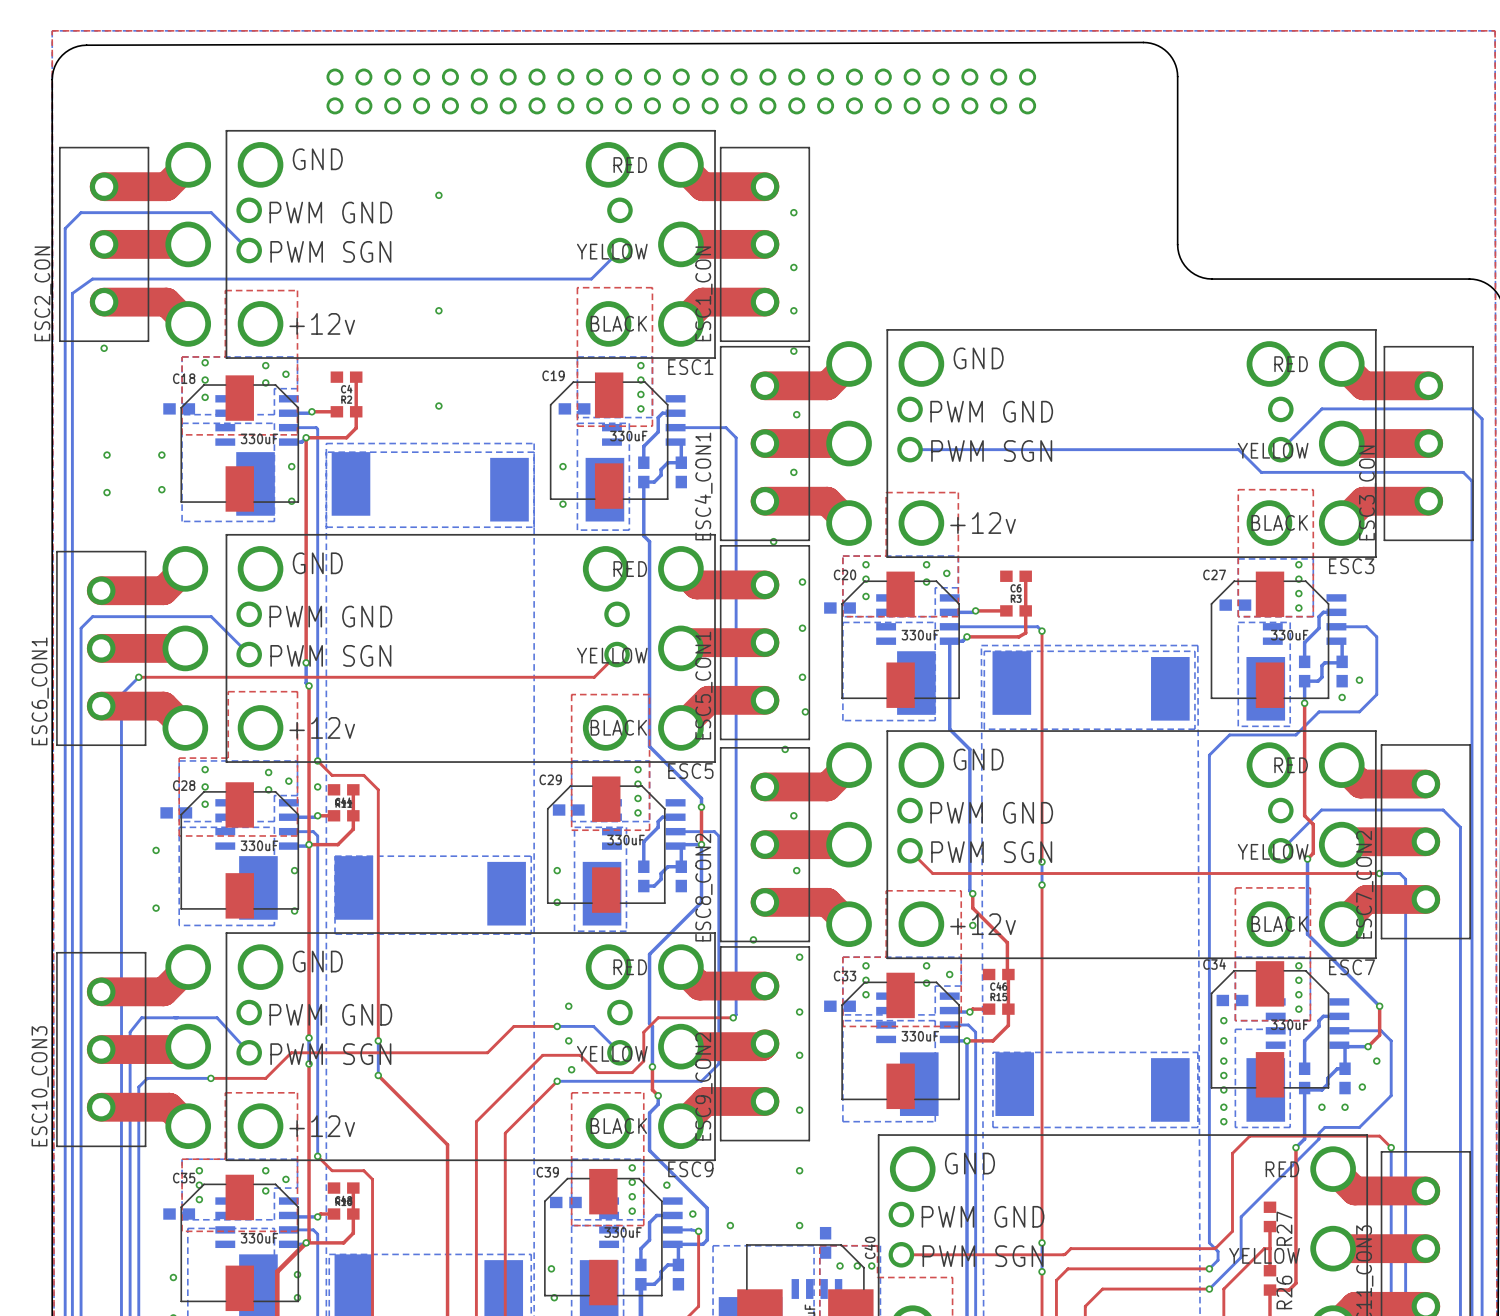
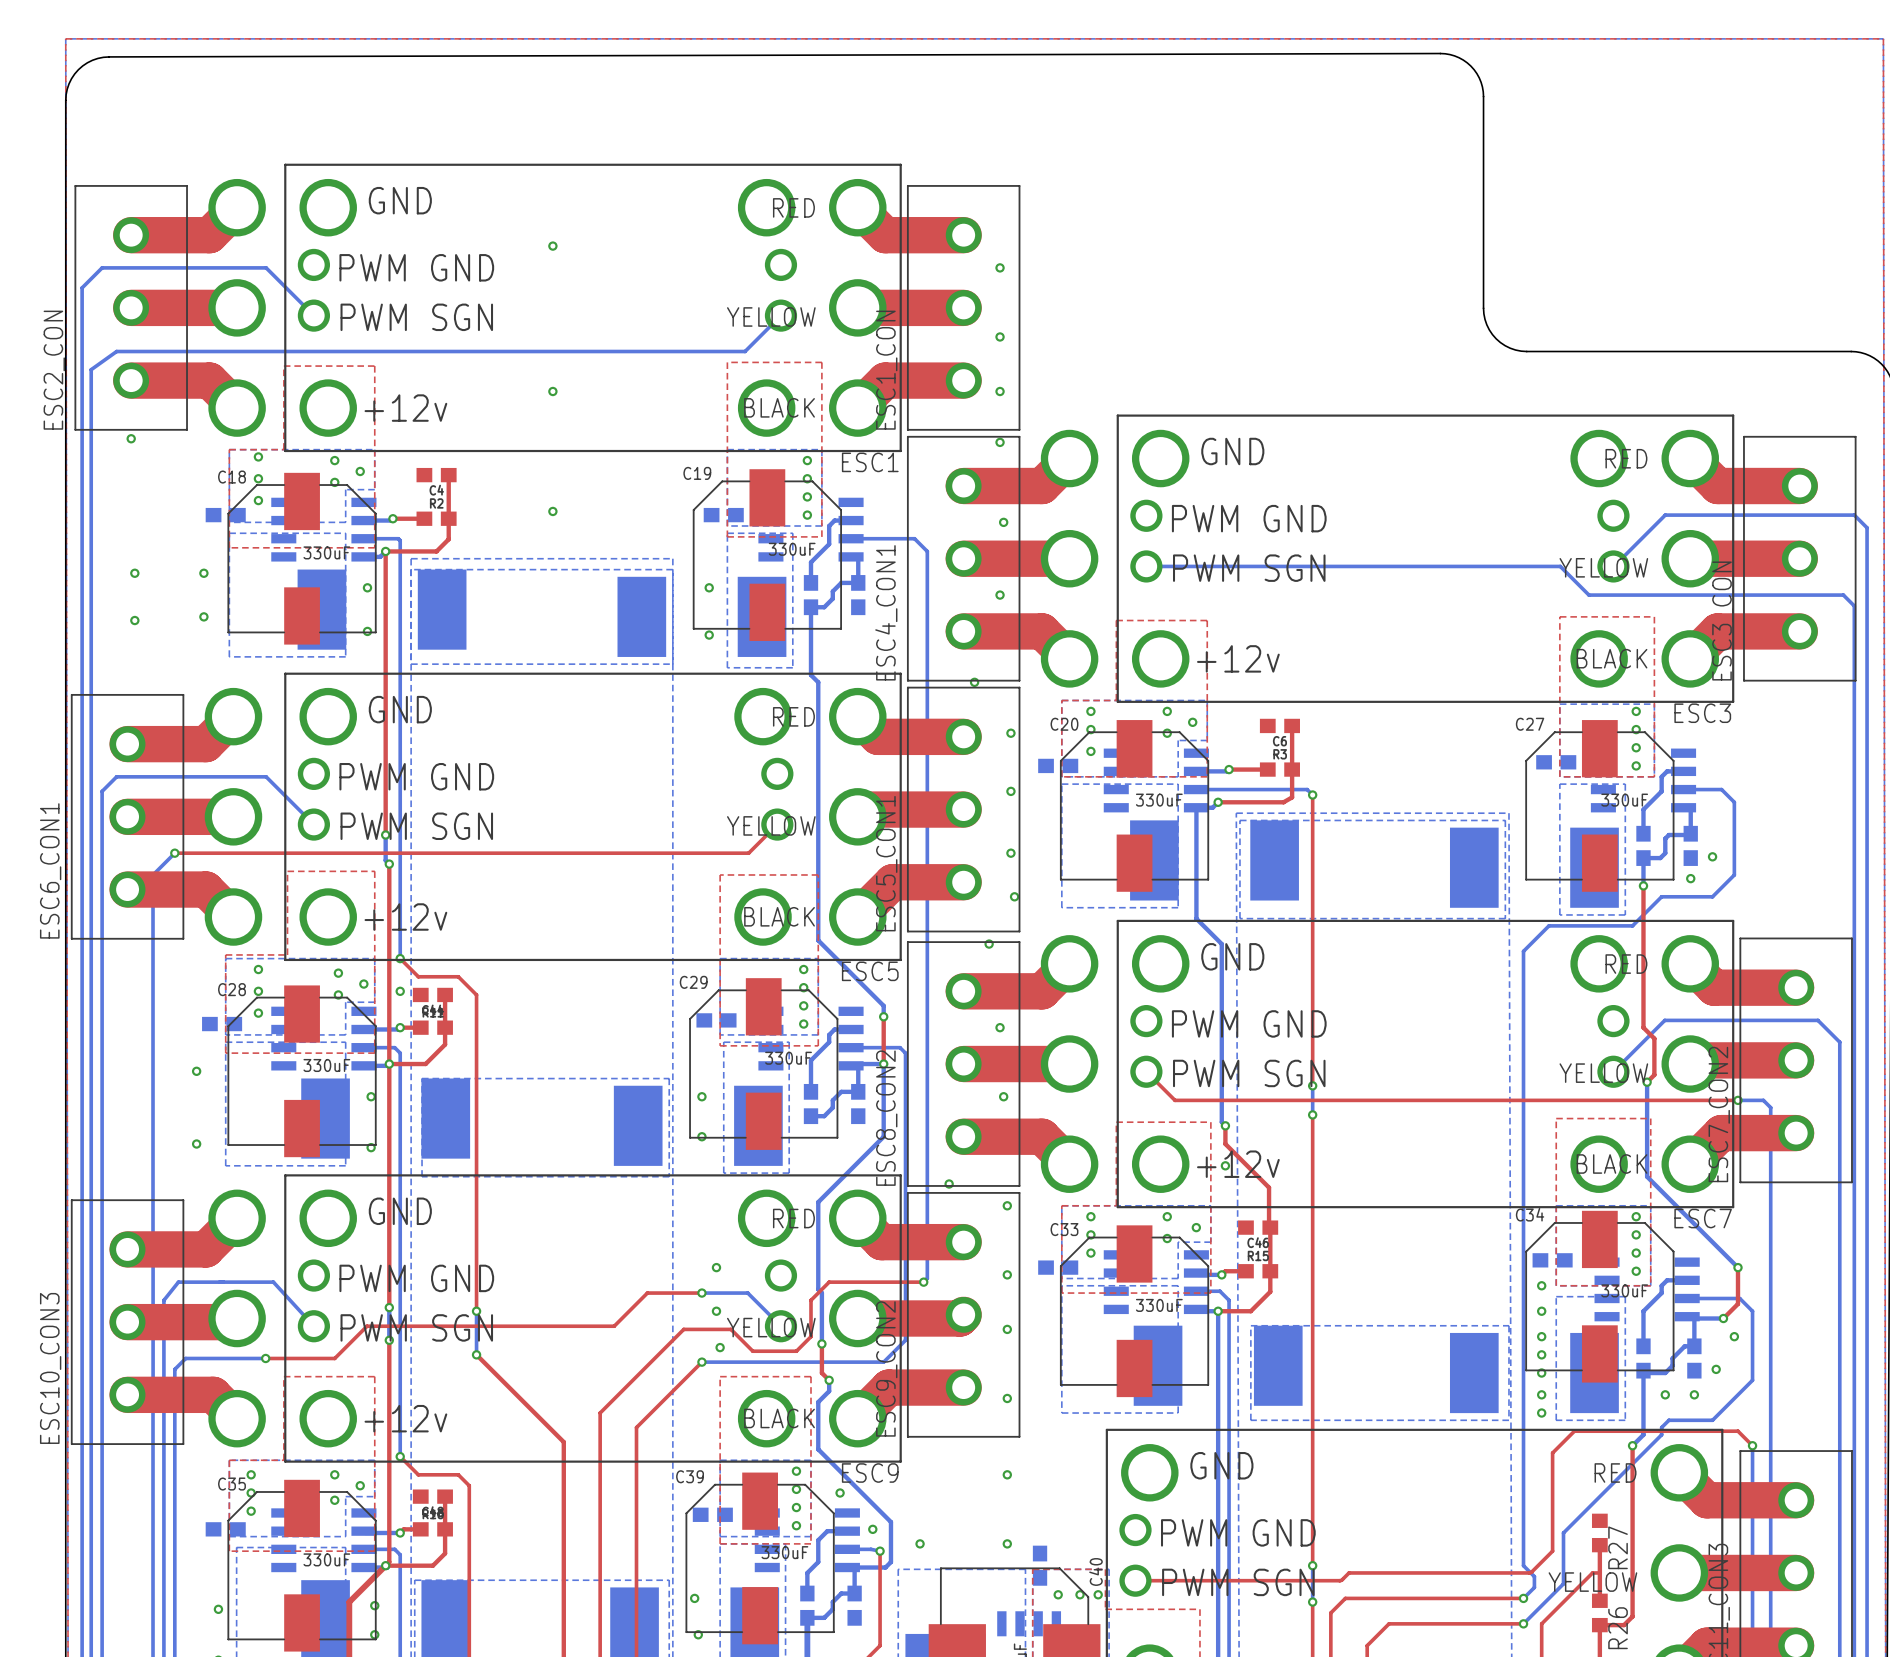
part: (681, 91) -> none

